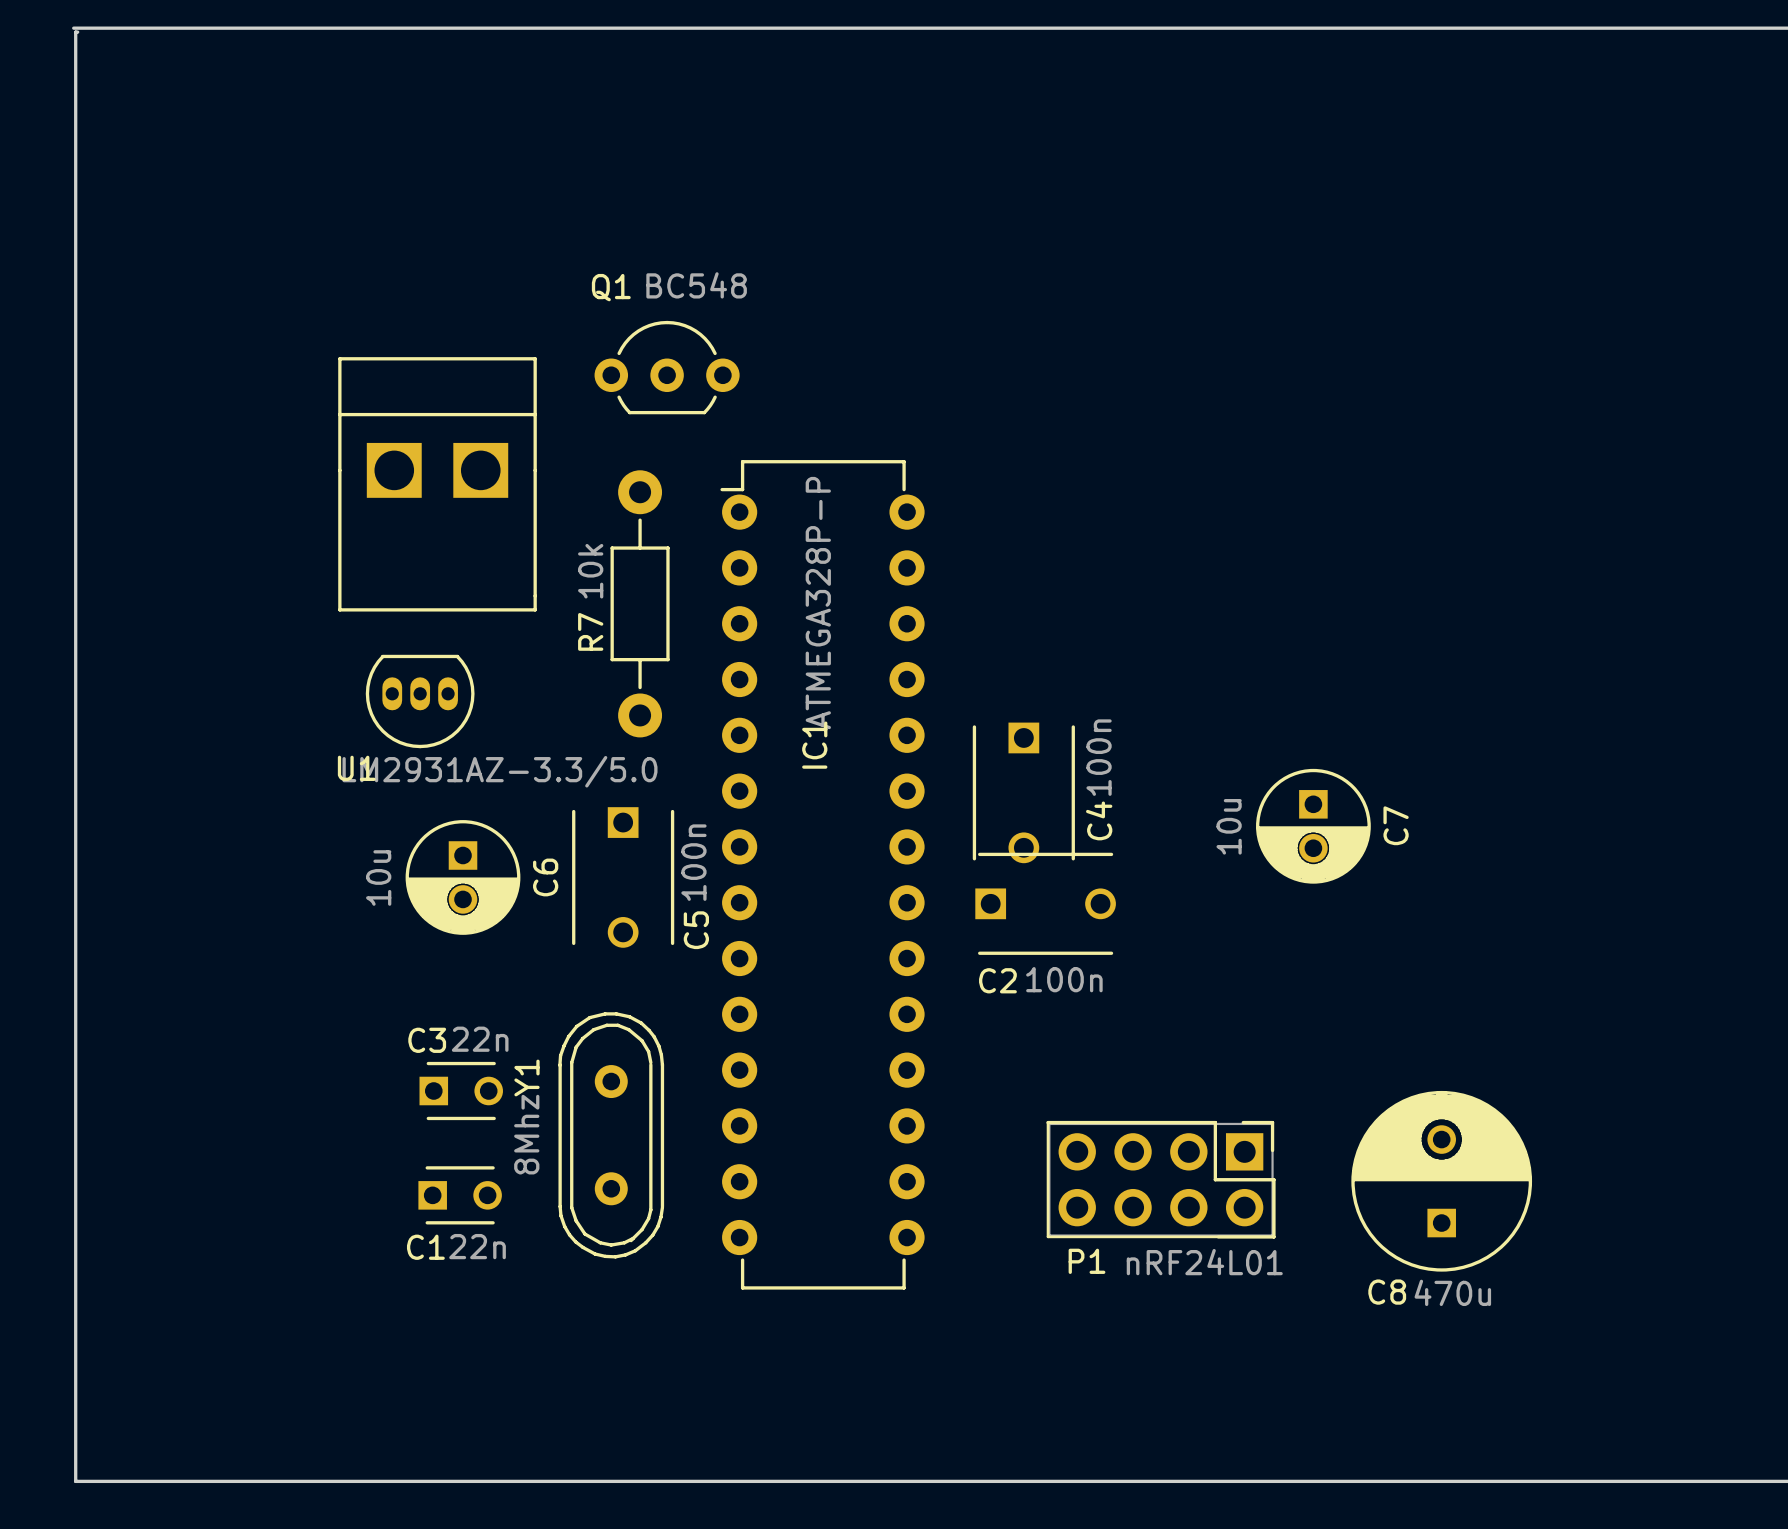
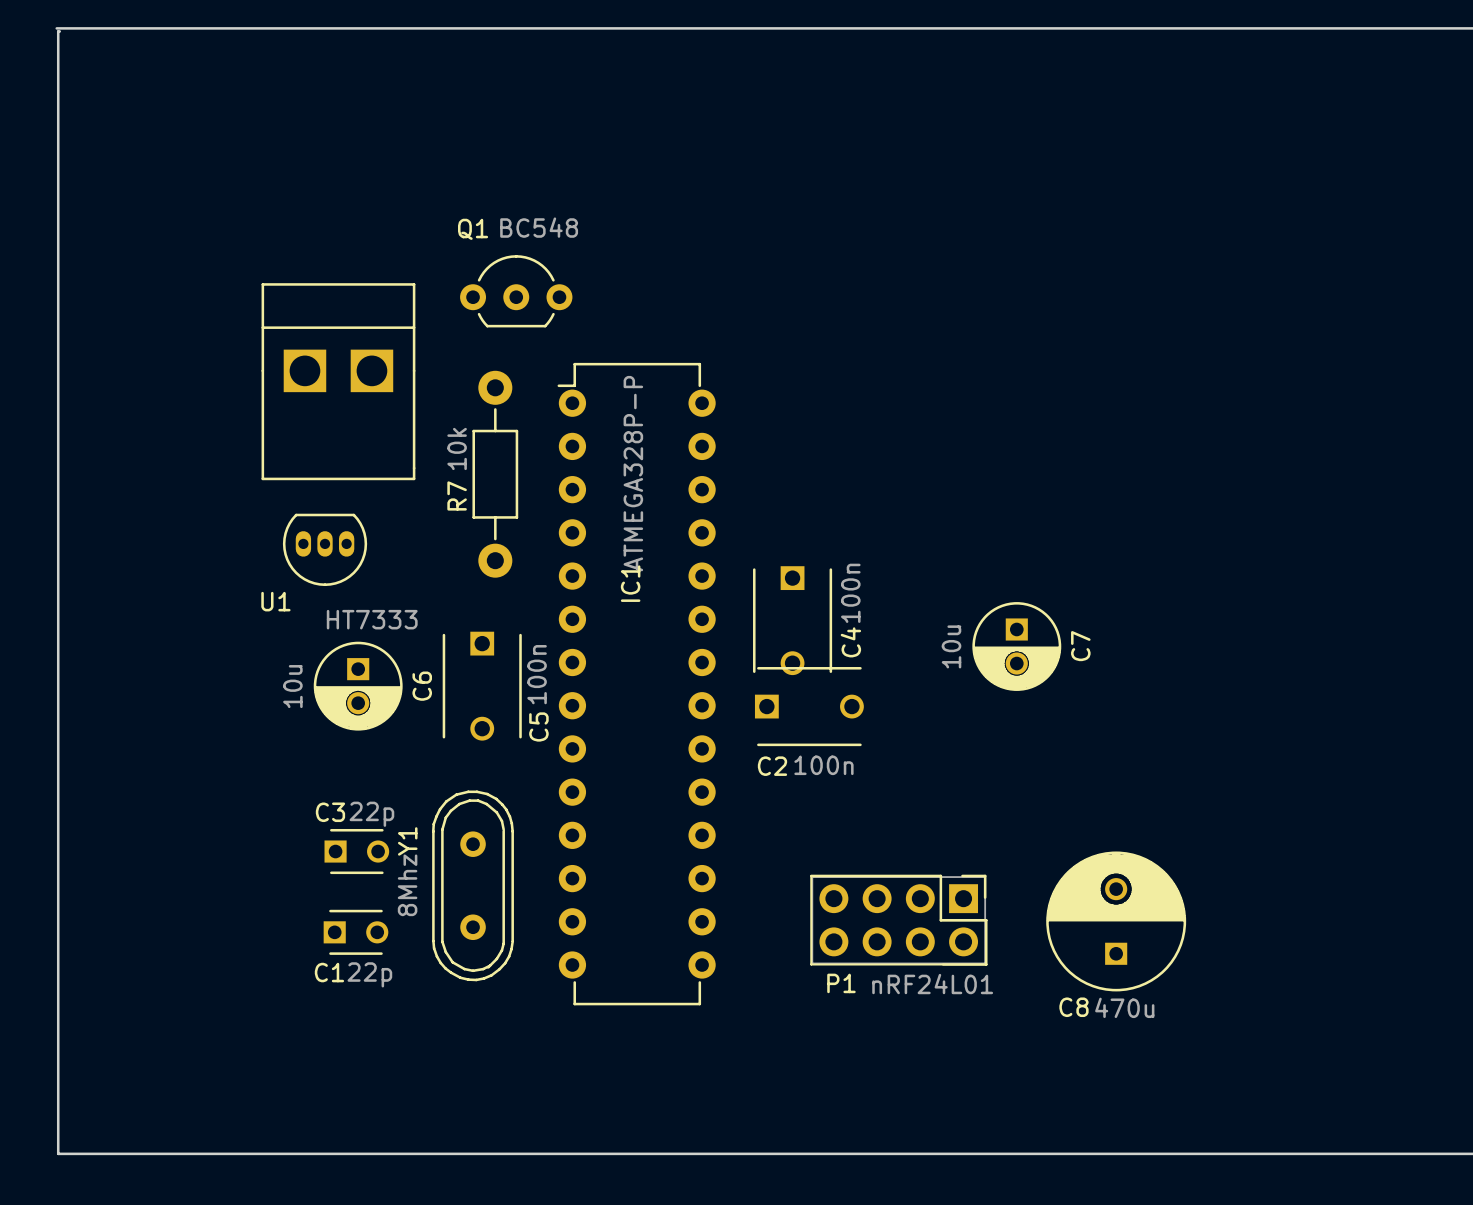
U1 value: LM2931AZ-3.3/5.0 (499, 771) -> HT7333 (372, 619)
C3 value: 22n (480, 1039) -> 22p (371, 814)
C1 value: 22n (477, 1246) -> 22p (369, 974)

